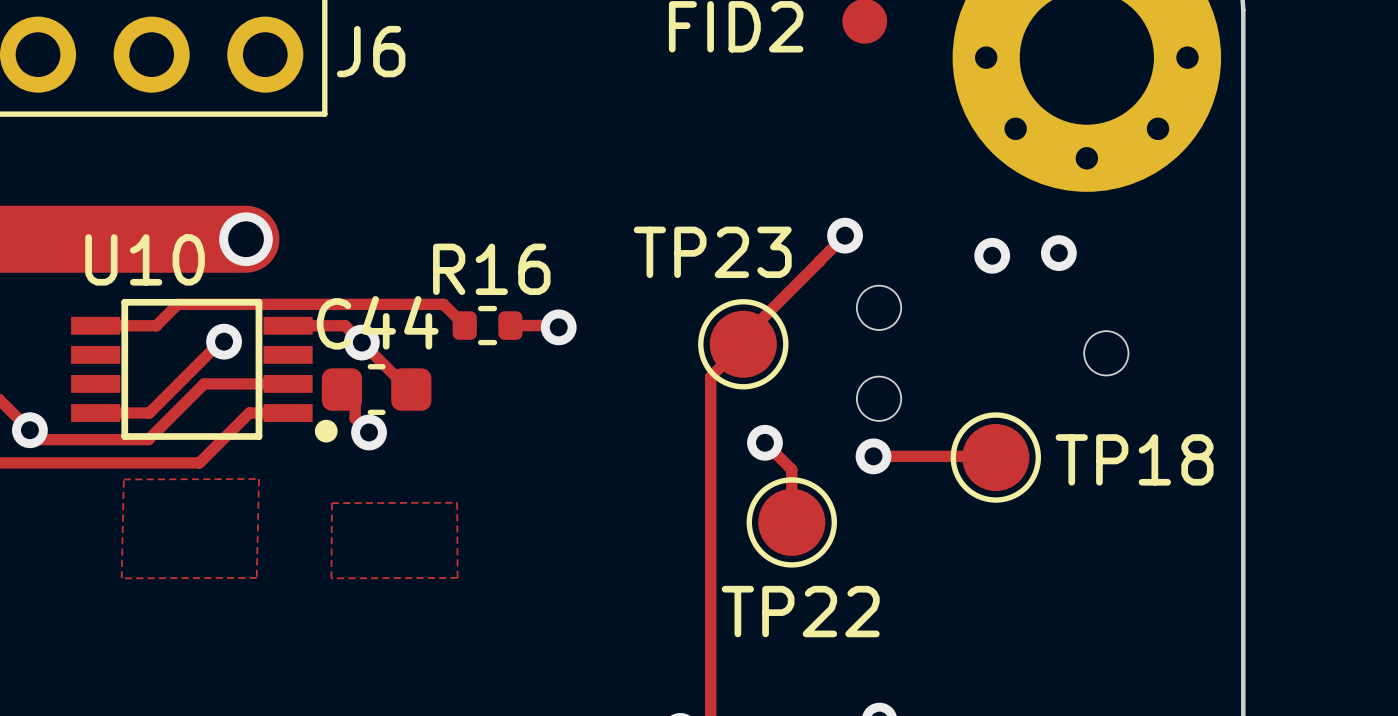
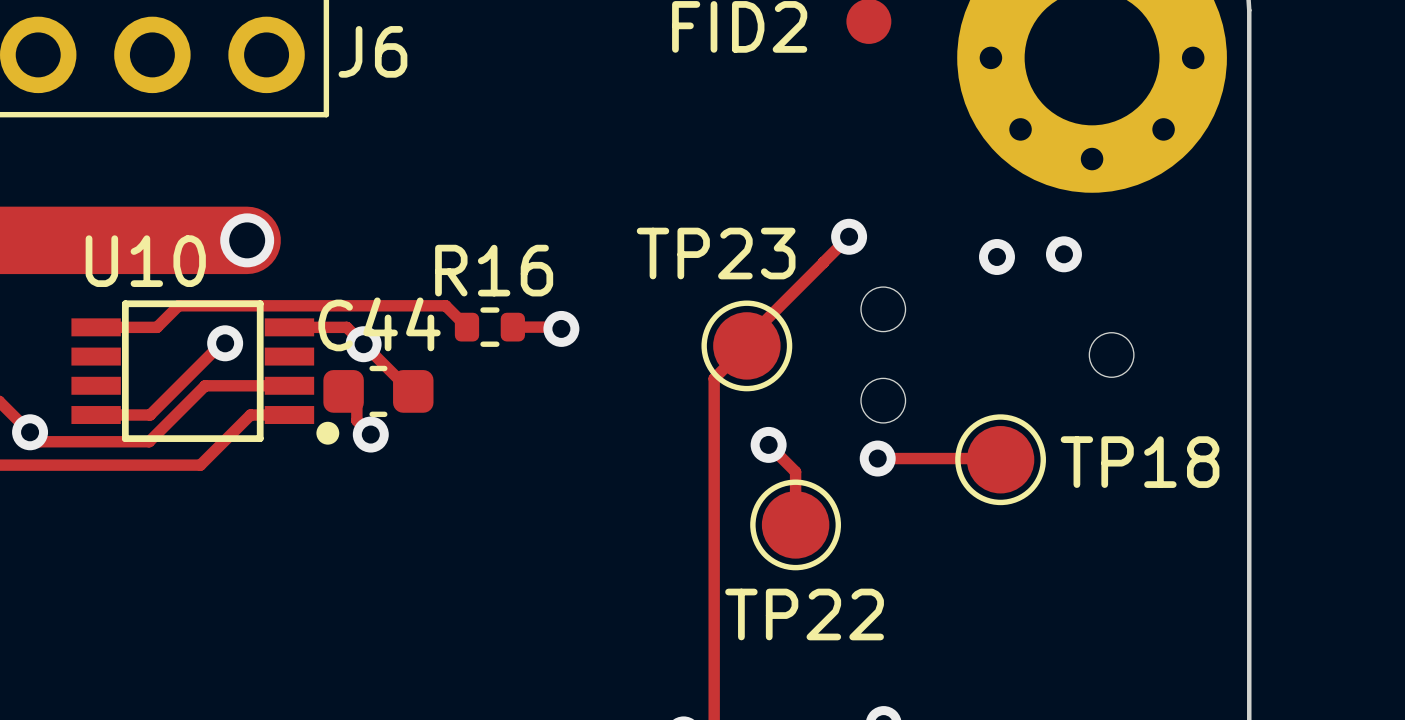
zone outline: (258, 479) (123, 479) (121, 578) (256, 577) (258, 479) -> none
zone outline: (457, 502) (331, 503) (331, 578) (457, 577) (457, 502) -> none

